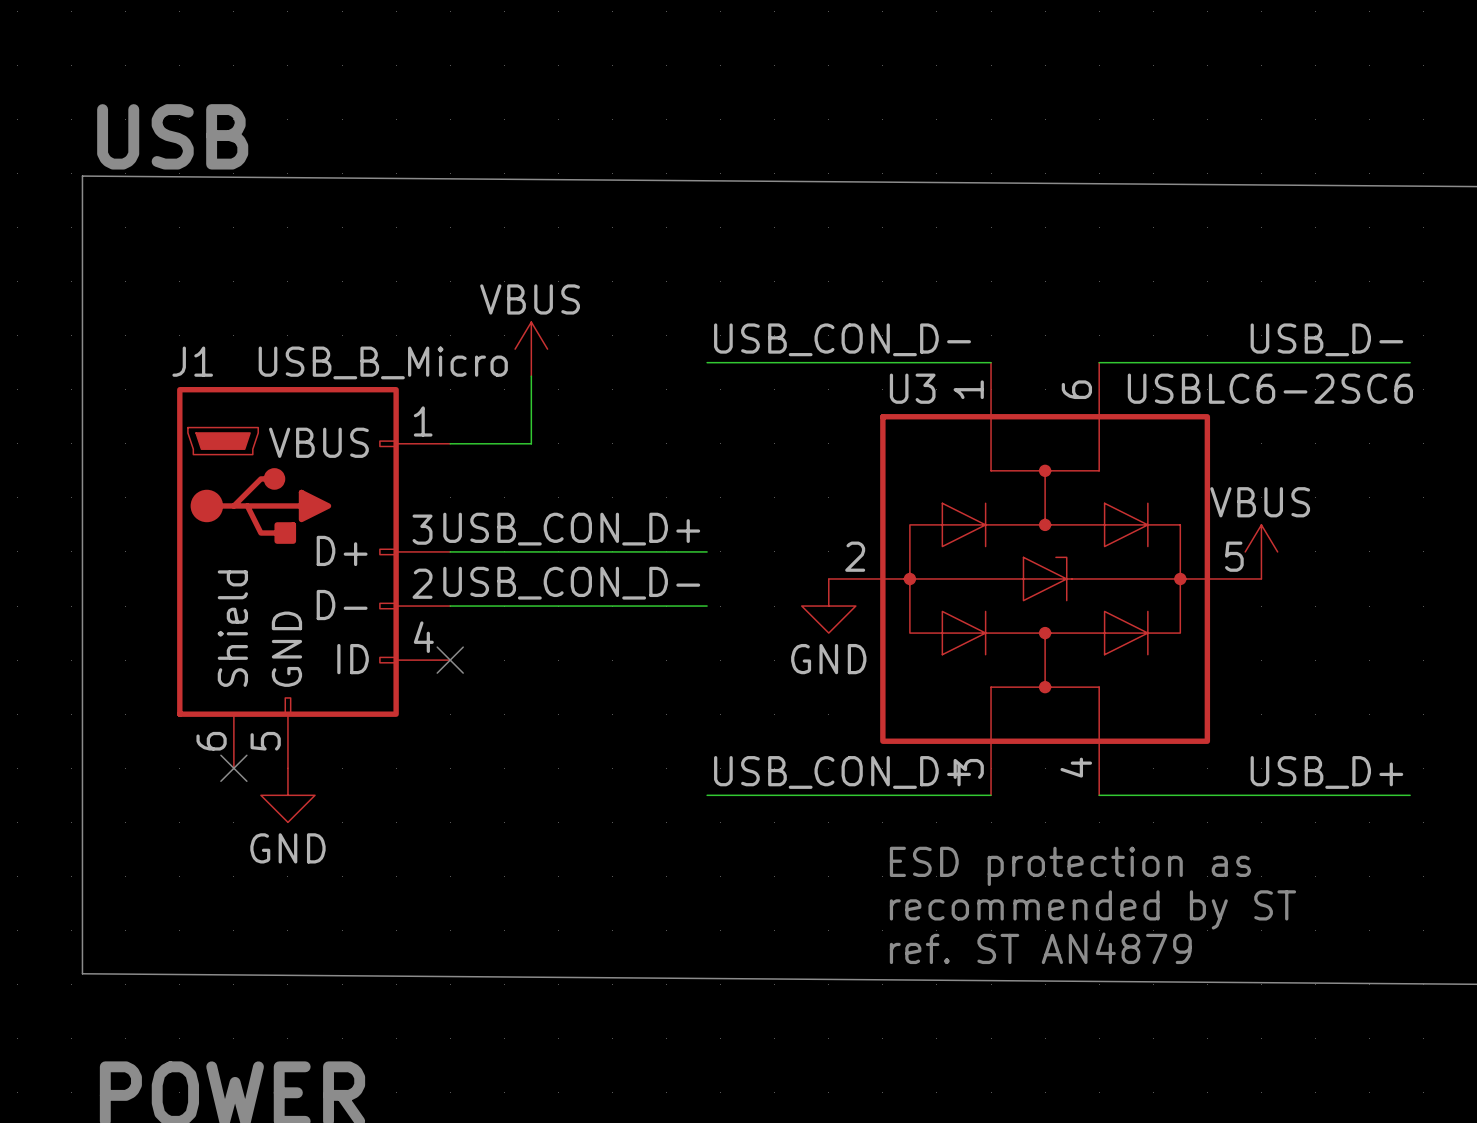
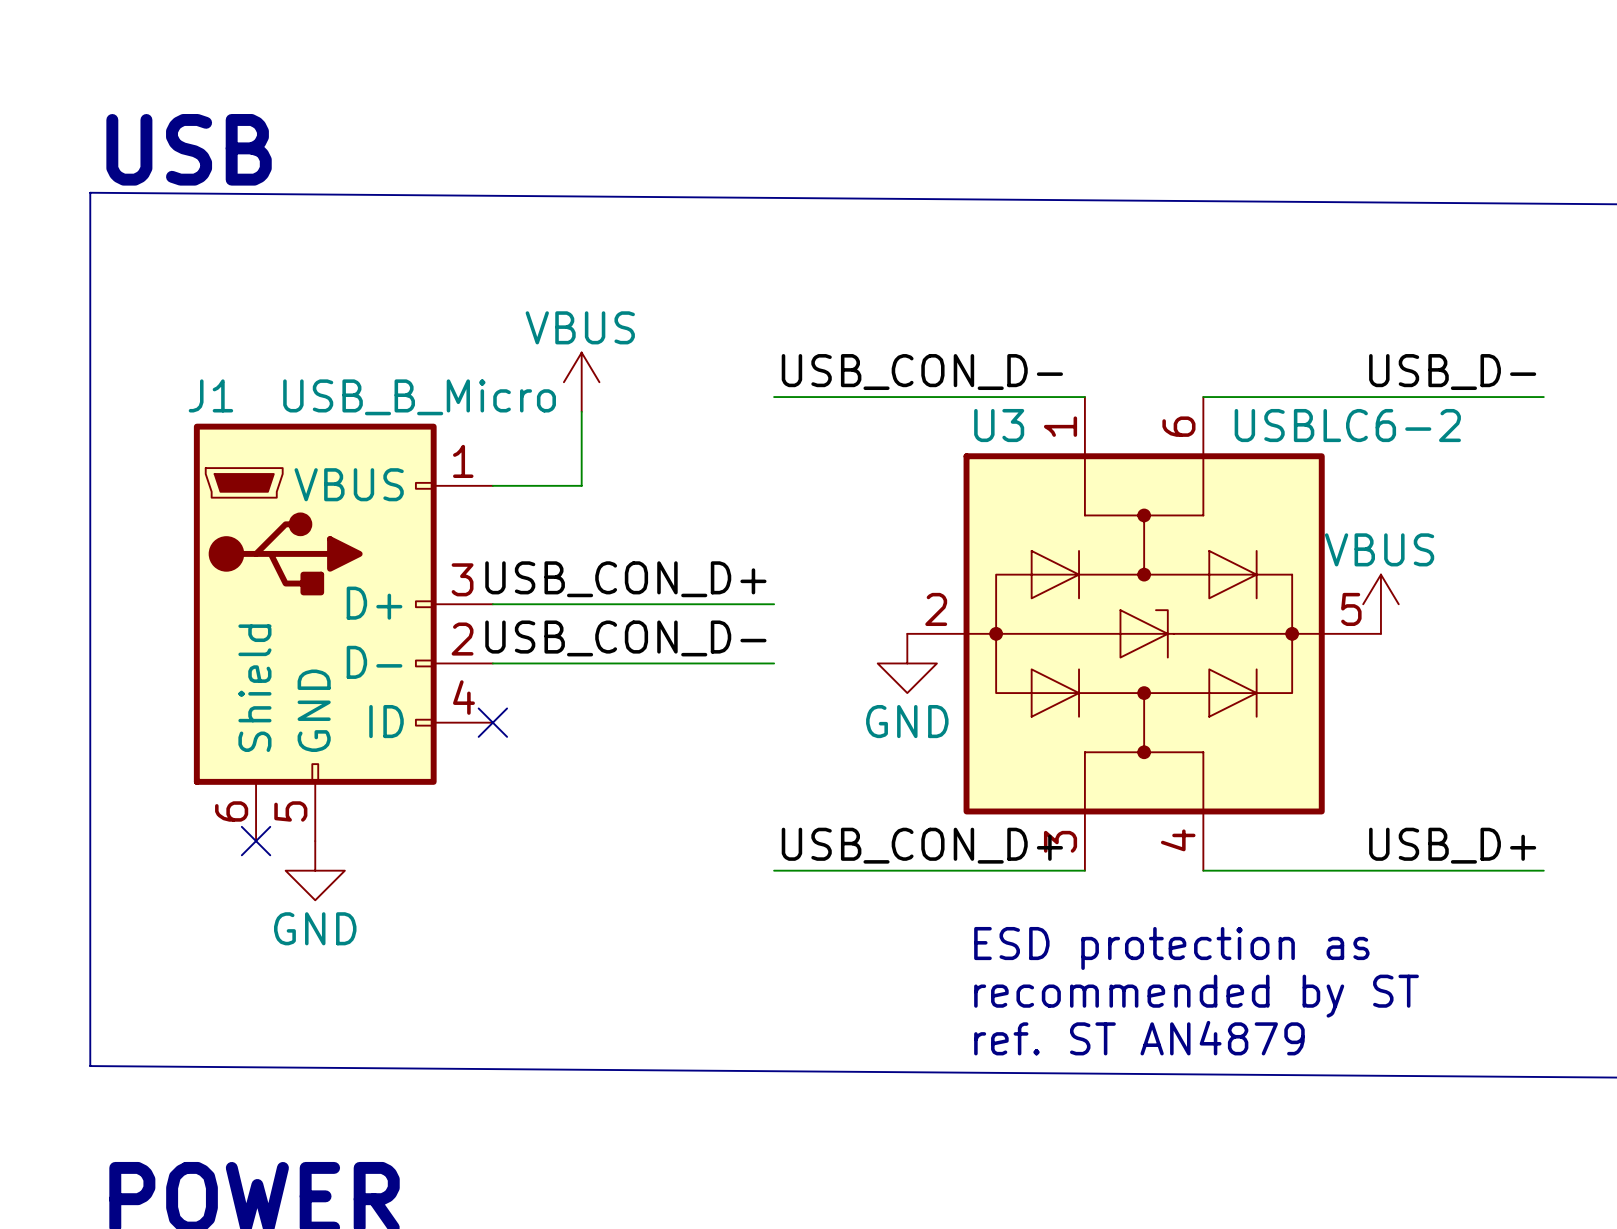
U3 value: USBLC6-2SC6 (1270, 388) -> USBLC6-2 (1347, 425)

